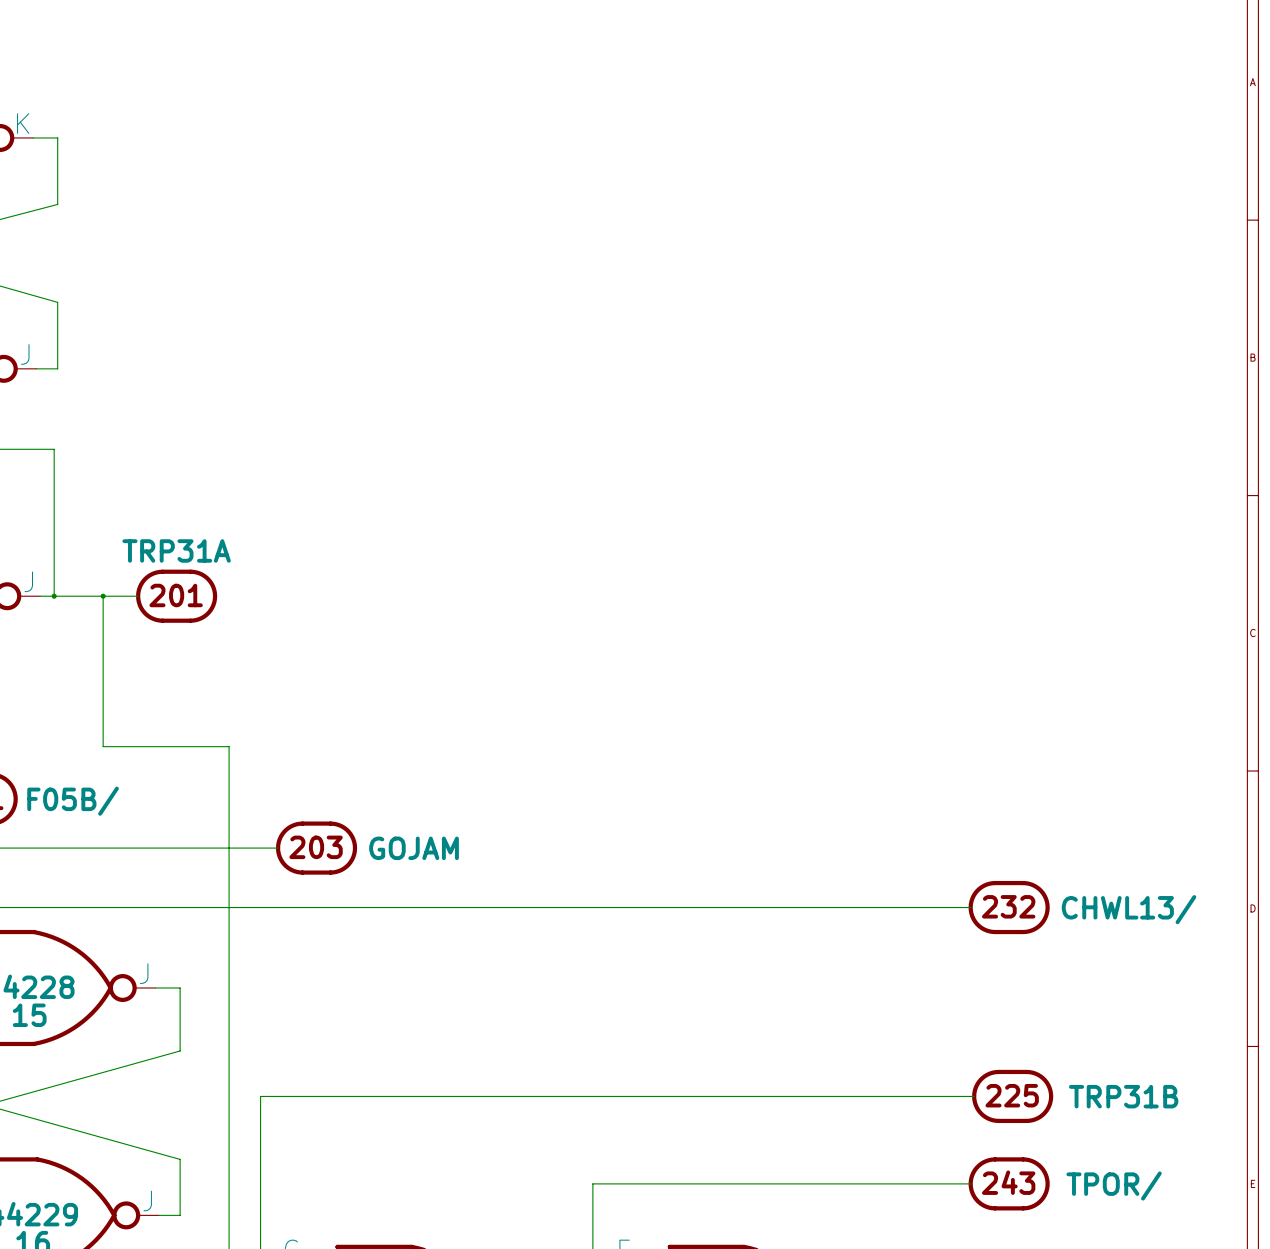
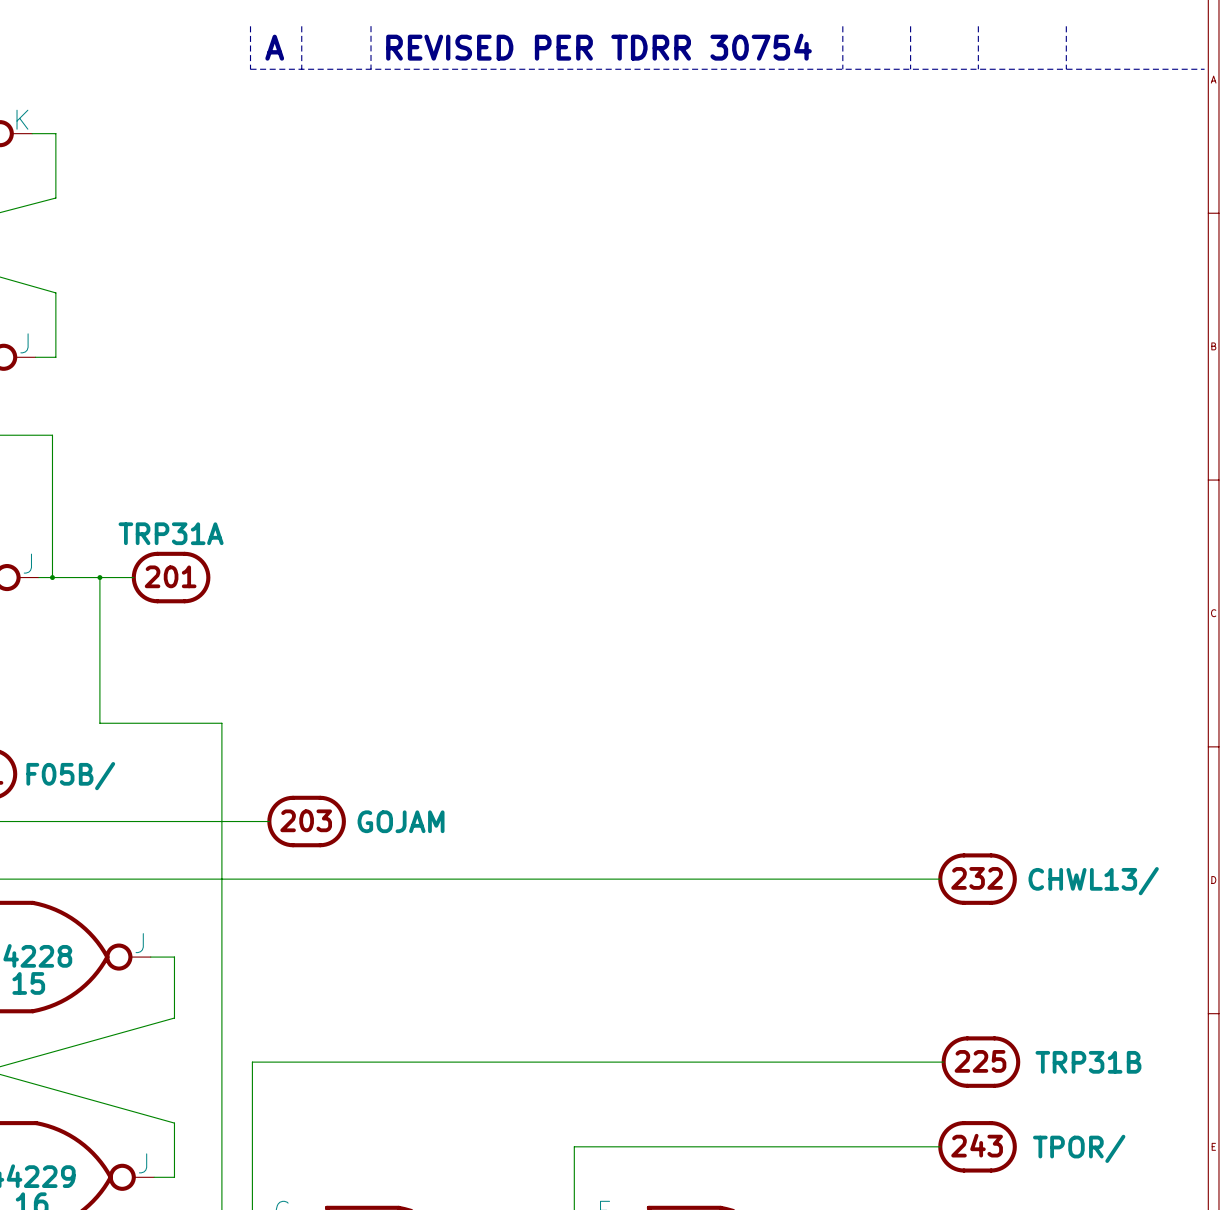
line: none -> (250, 26) (250, 69) (1204, 69)
line: none -> (301, 26) (301, 69)
line: none -> (371, 26) (371, 69)
line: none -> (842, 26) (842, 69)
line: none -> (910, 26) (910, 69)
line: none -> (978, 26) (978, 69)
line: none -> (1066, 26) (1066, 69)
text: none -> A REVISED PER TDRR 30754 (538, 47)

